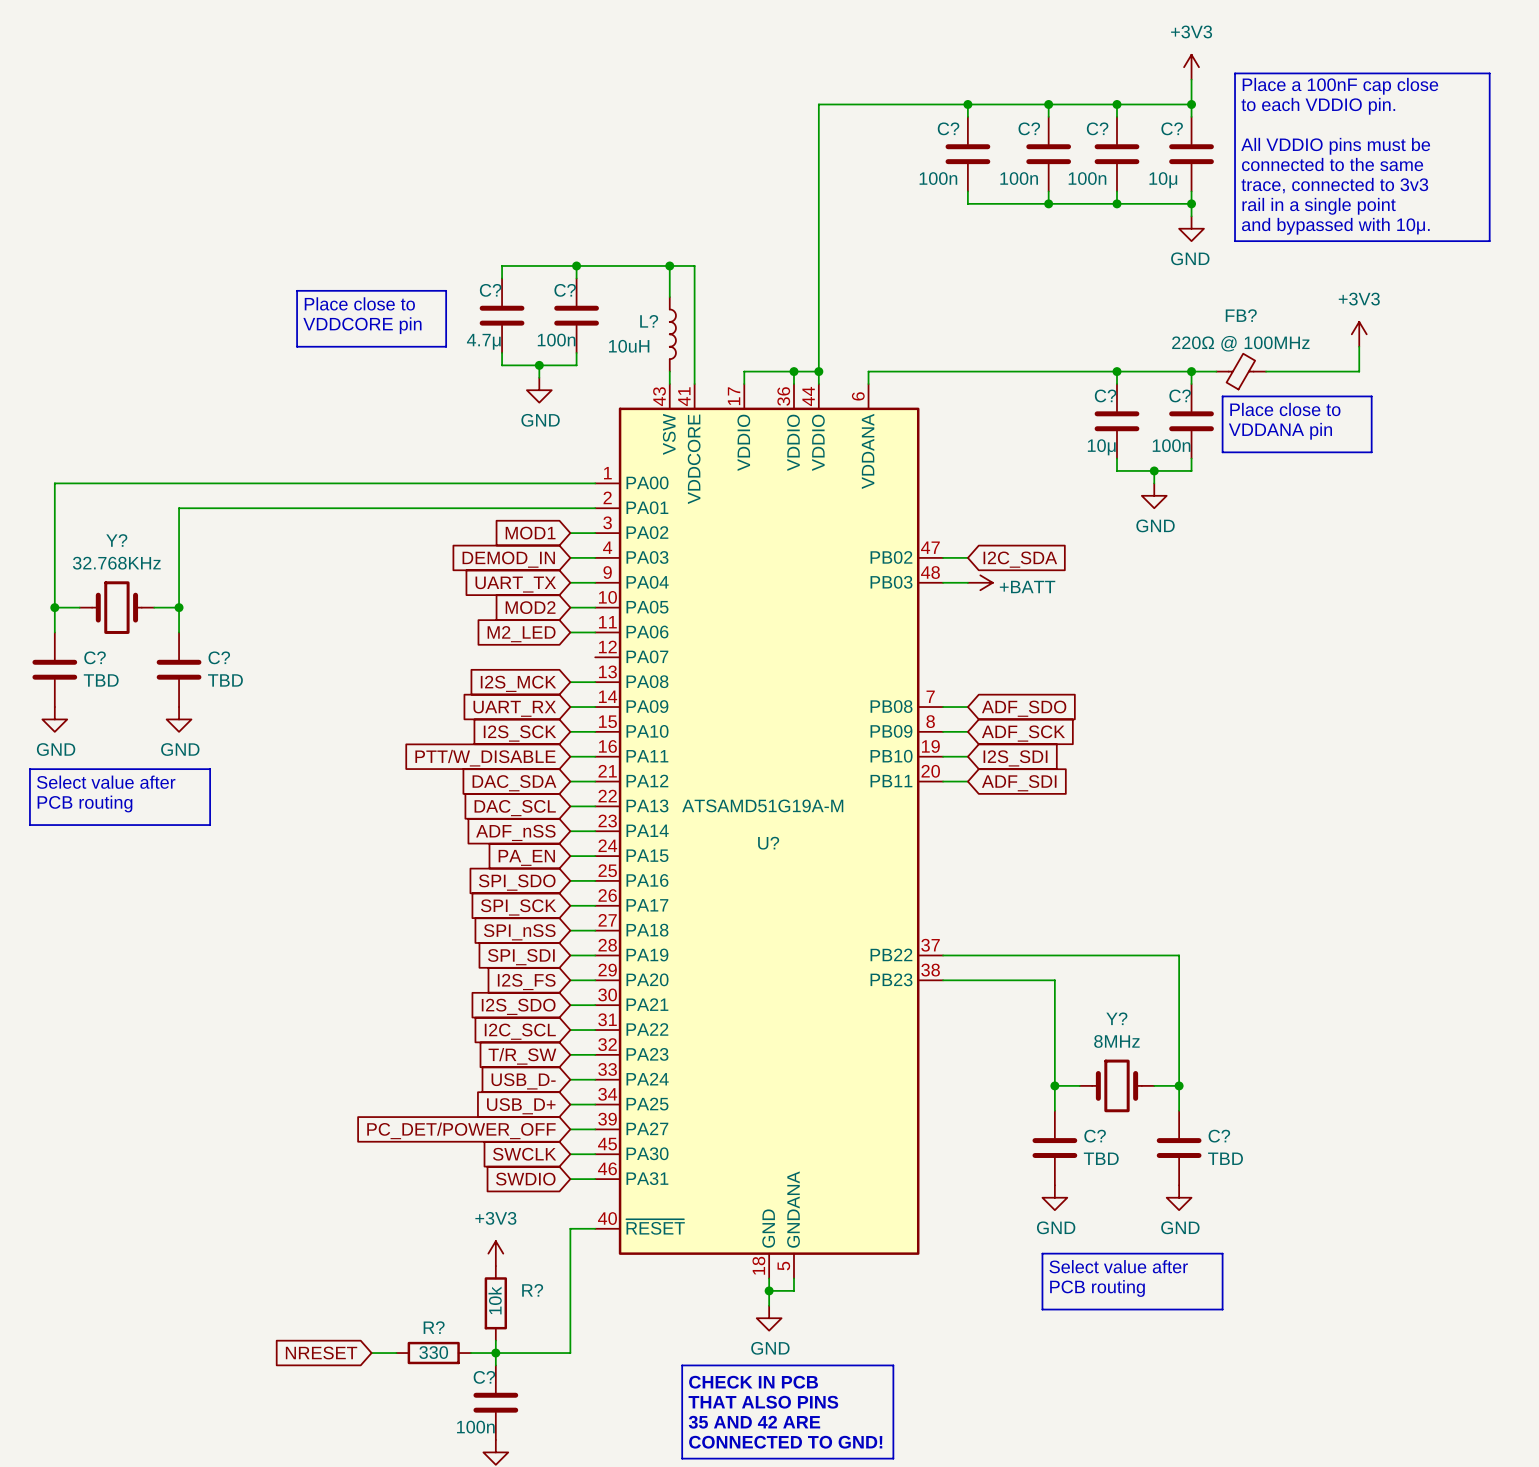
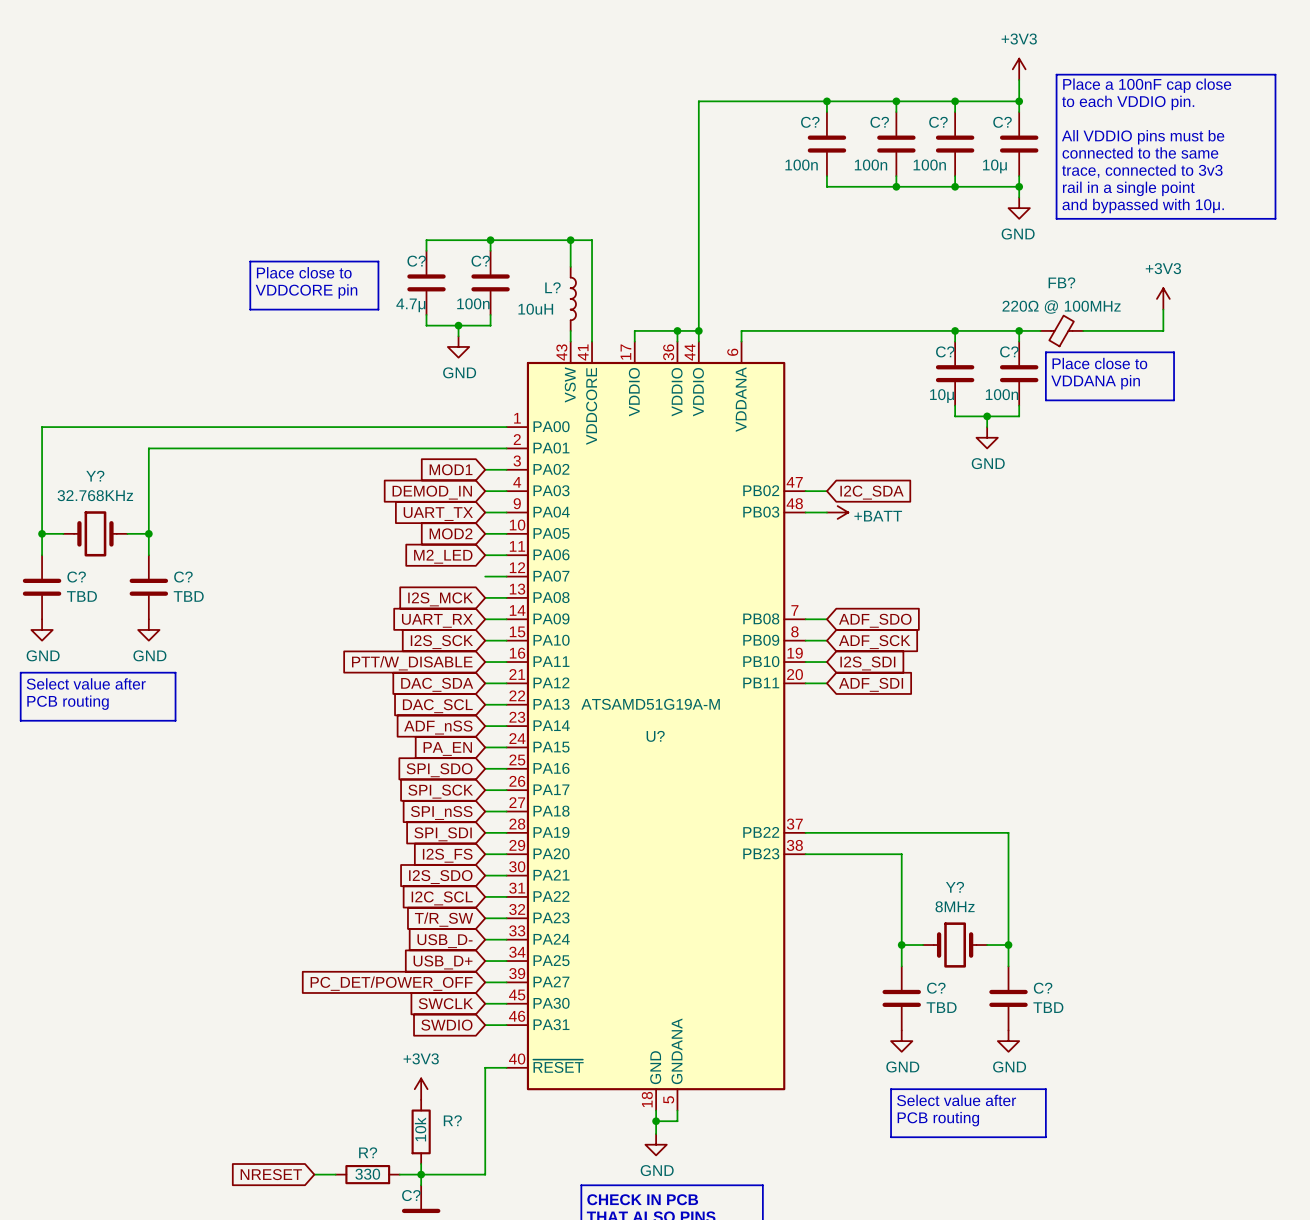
wire: none -> (485, 576) (506, 576)

